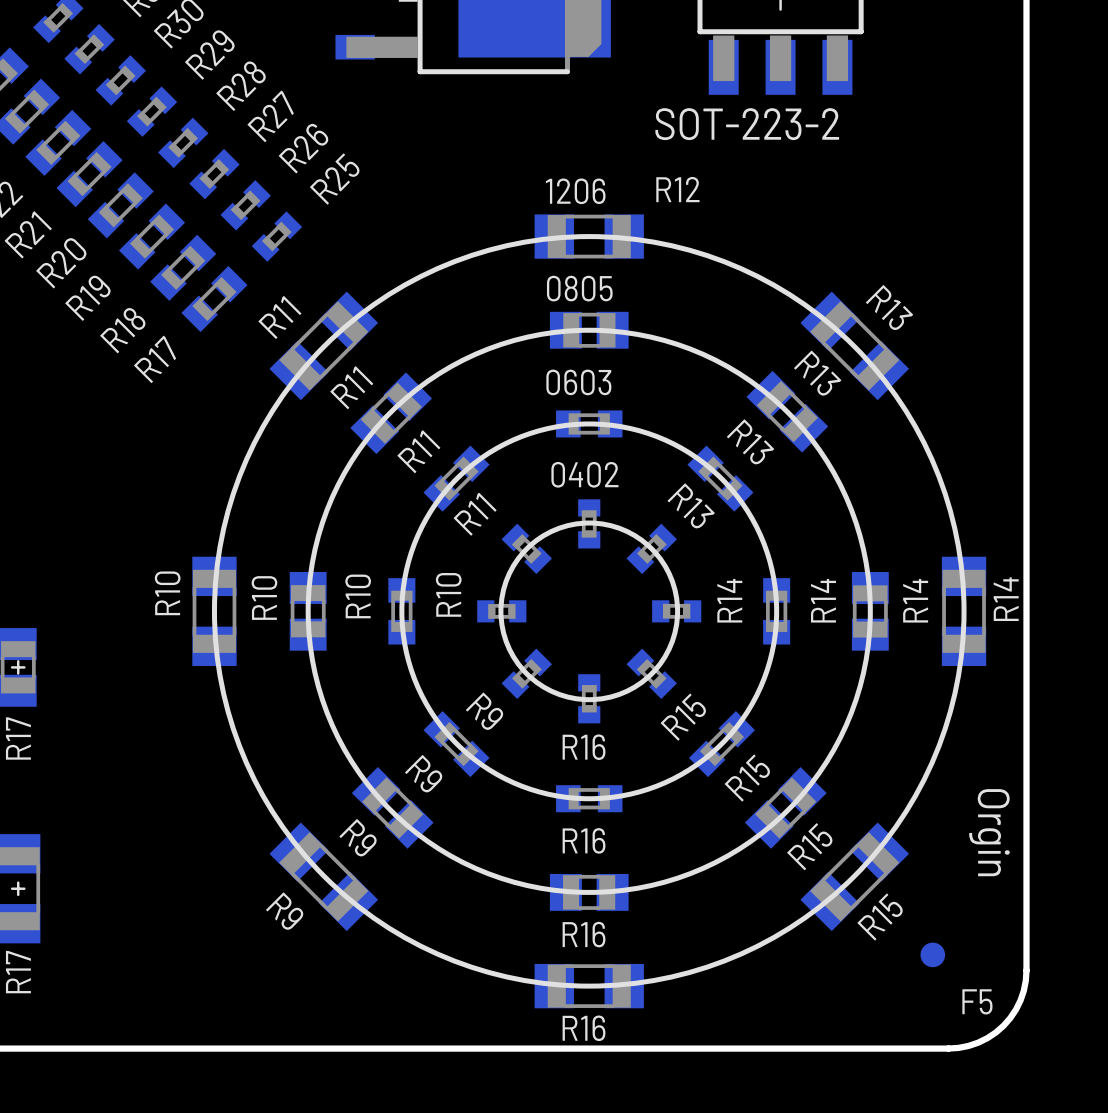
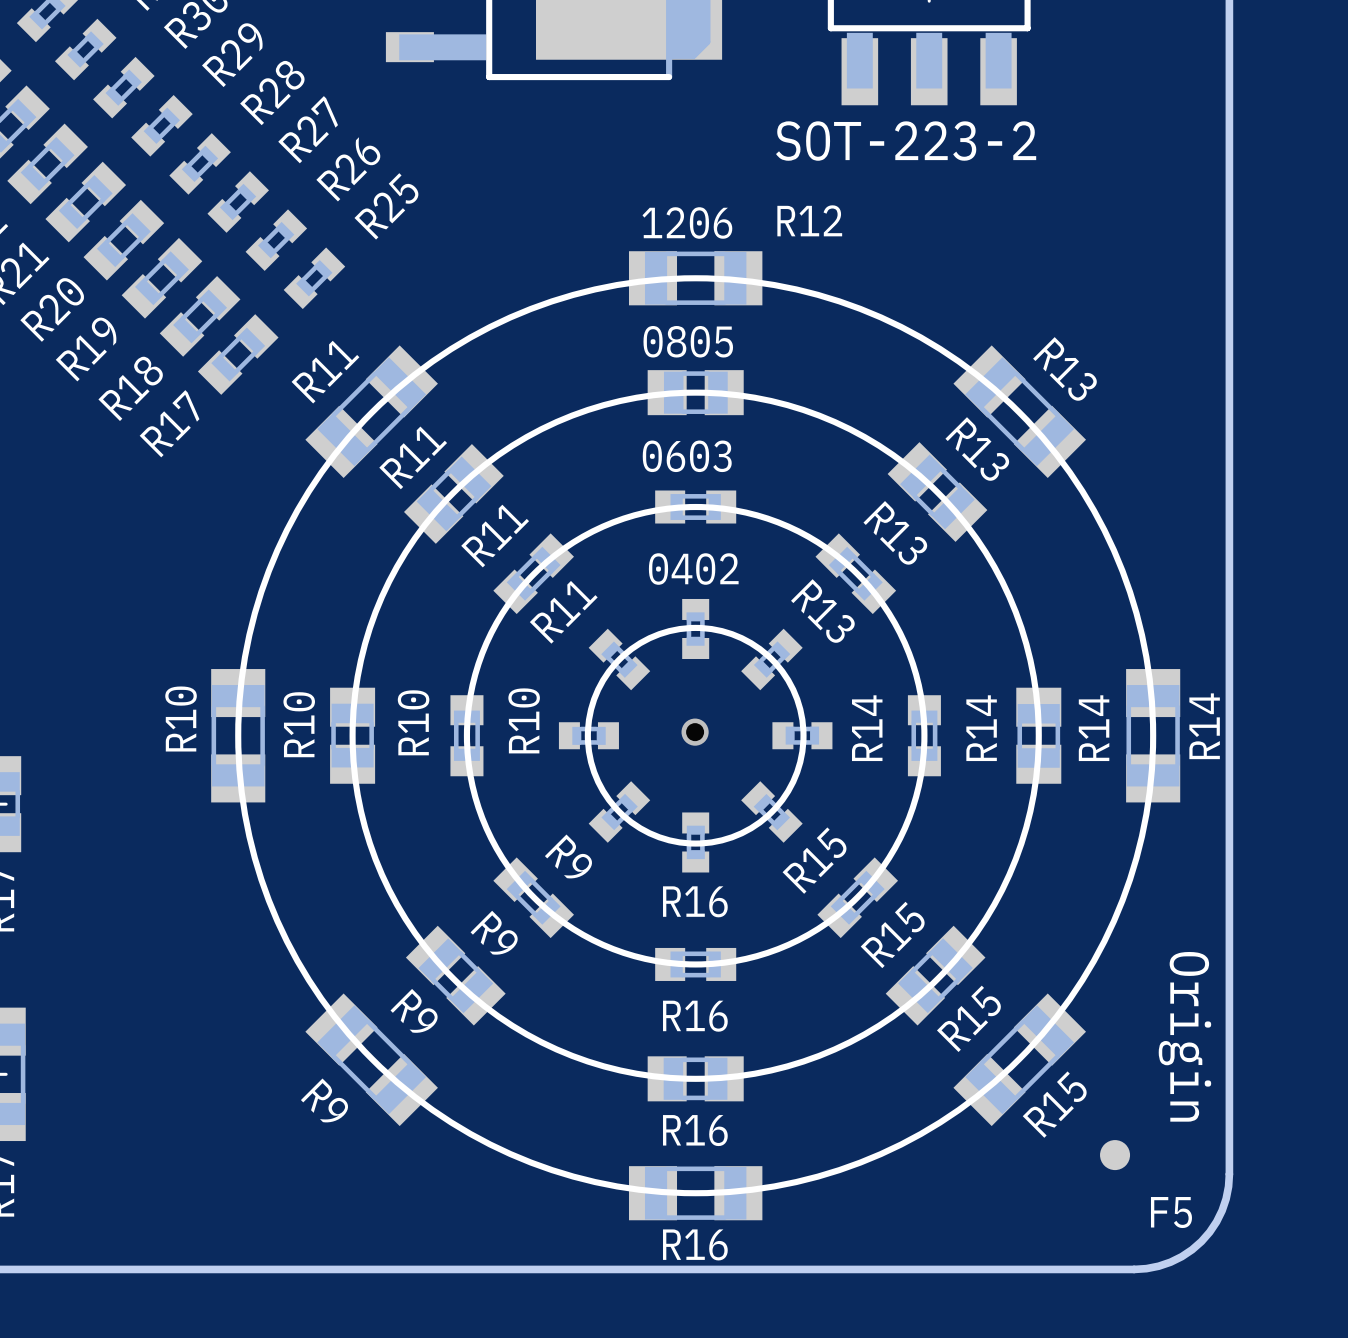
via: none -> (695, 732)
text: Orgin (989, 832) -> Origin (1184, 1036)

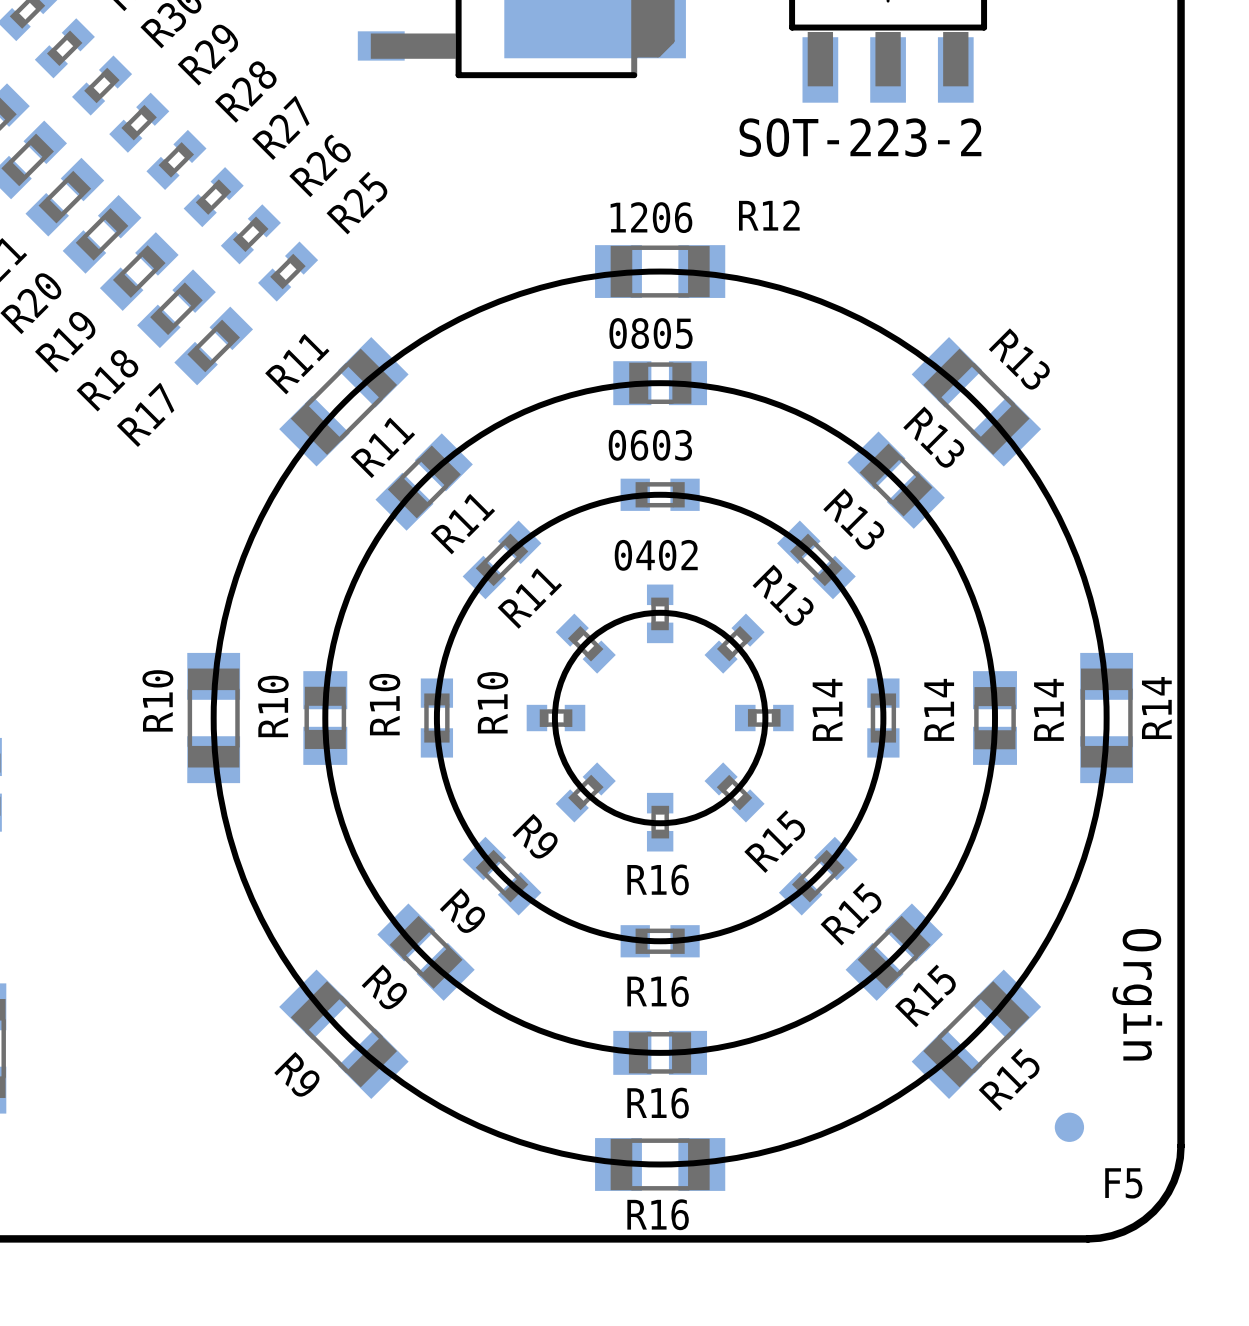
via: (695, 732) -> none
text: Origin (1184, 1036) -> Orgin (1137, 994)

